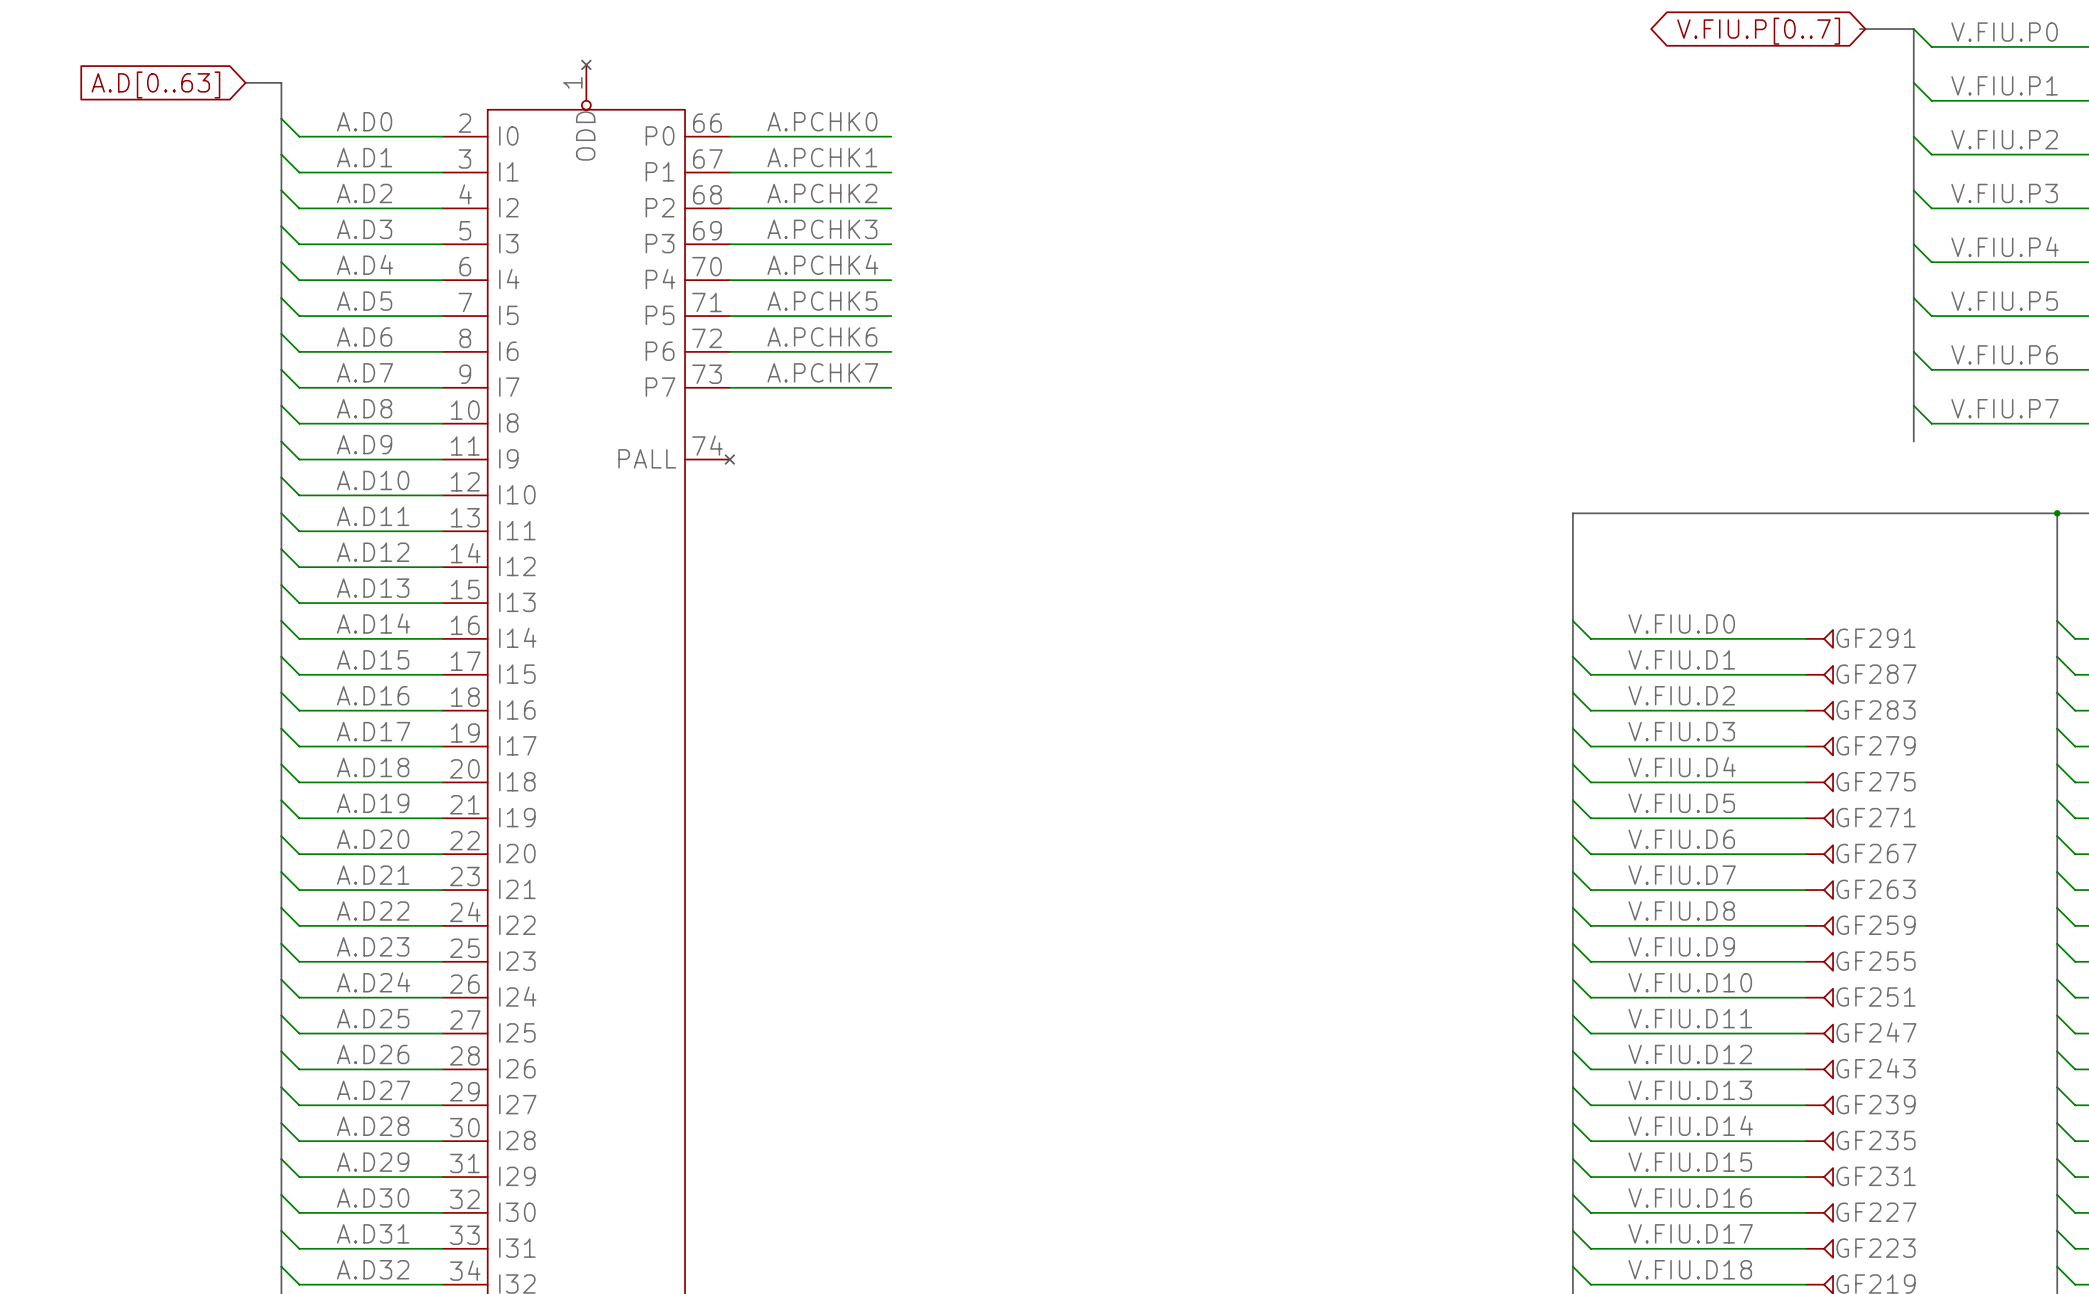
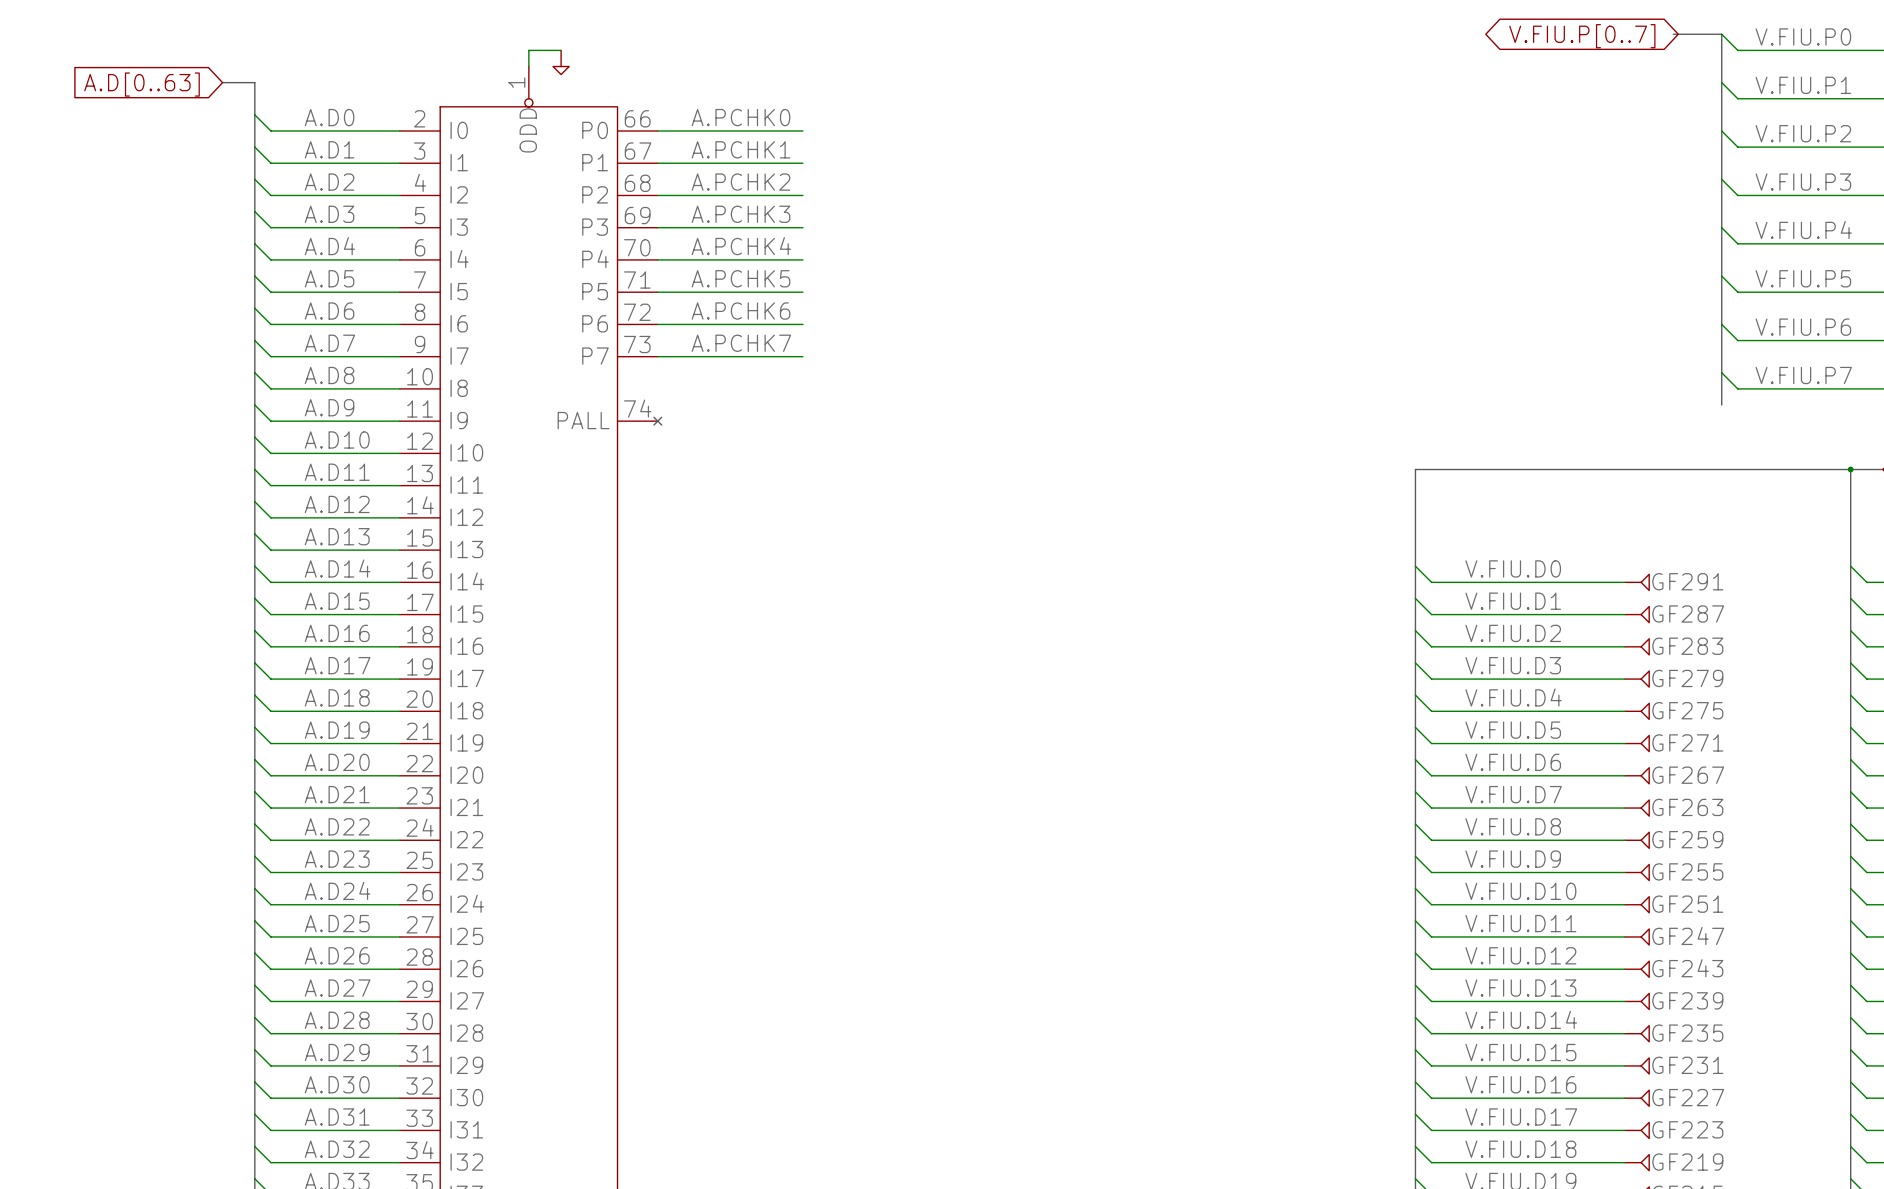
wire: none -> (561, 50) (528, 50) (528, 66)
power symbol: none -> (561, 62)
no-connect mark: (586, 64) -> none

